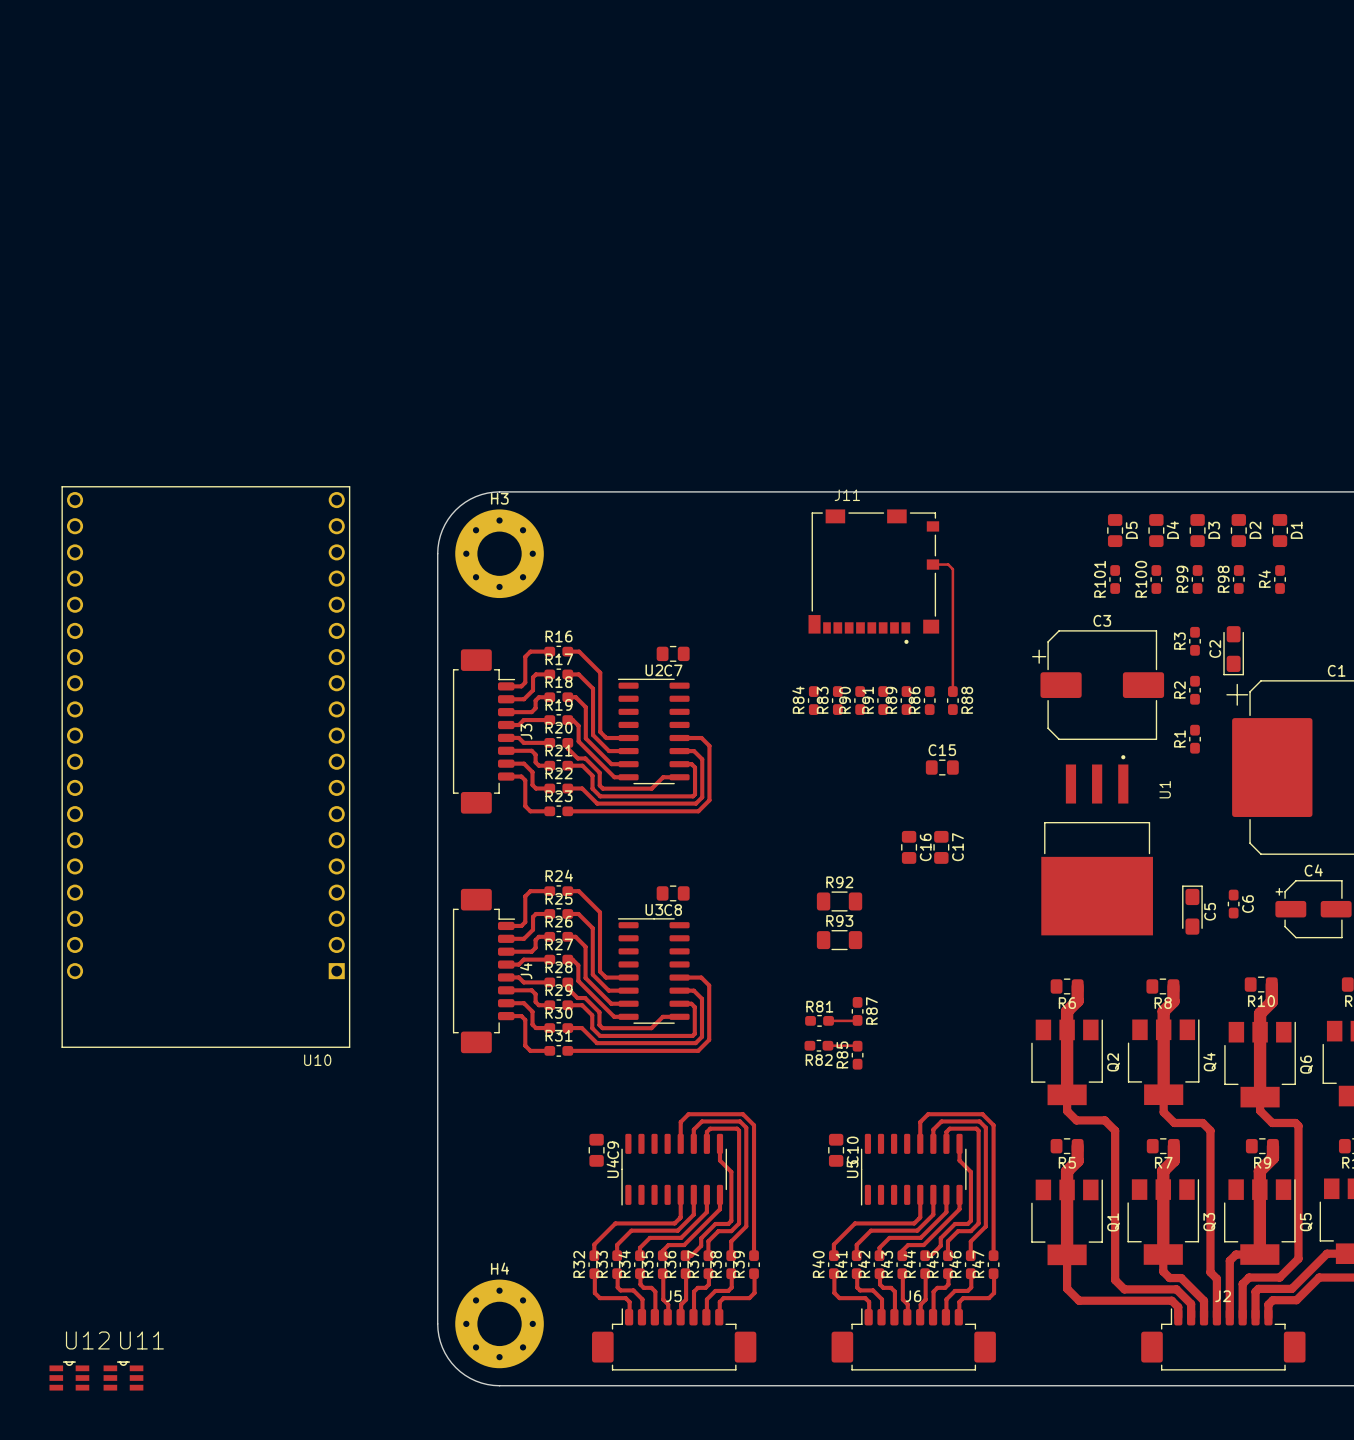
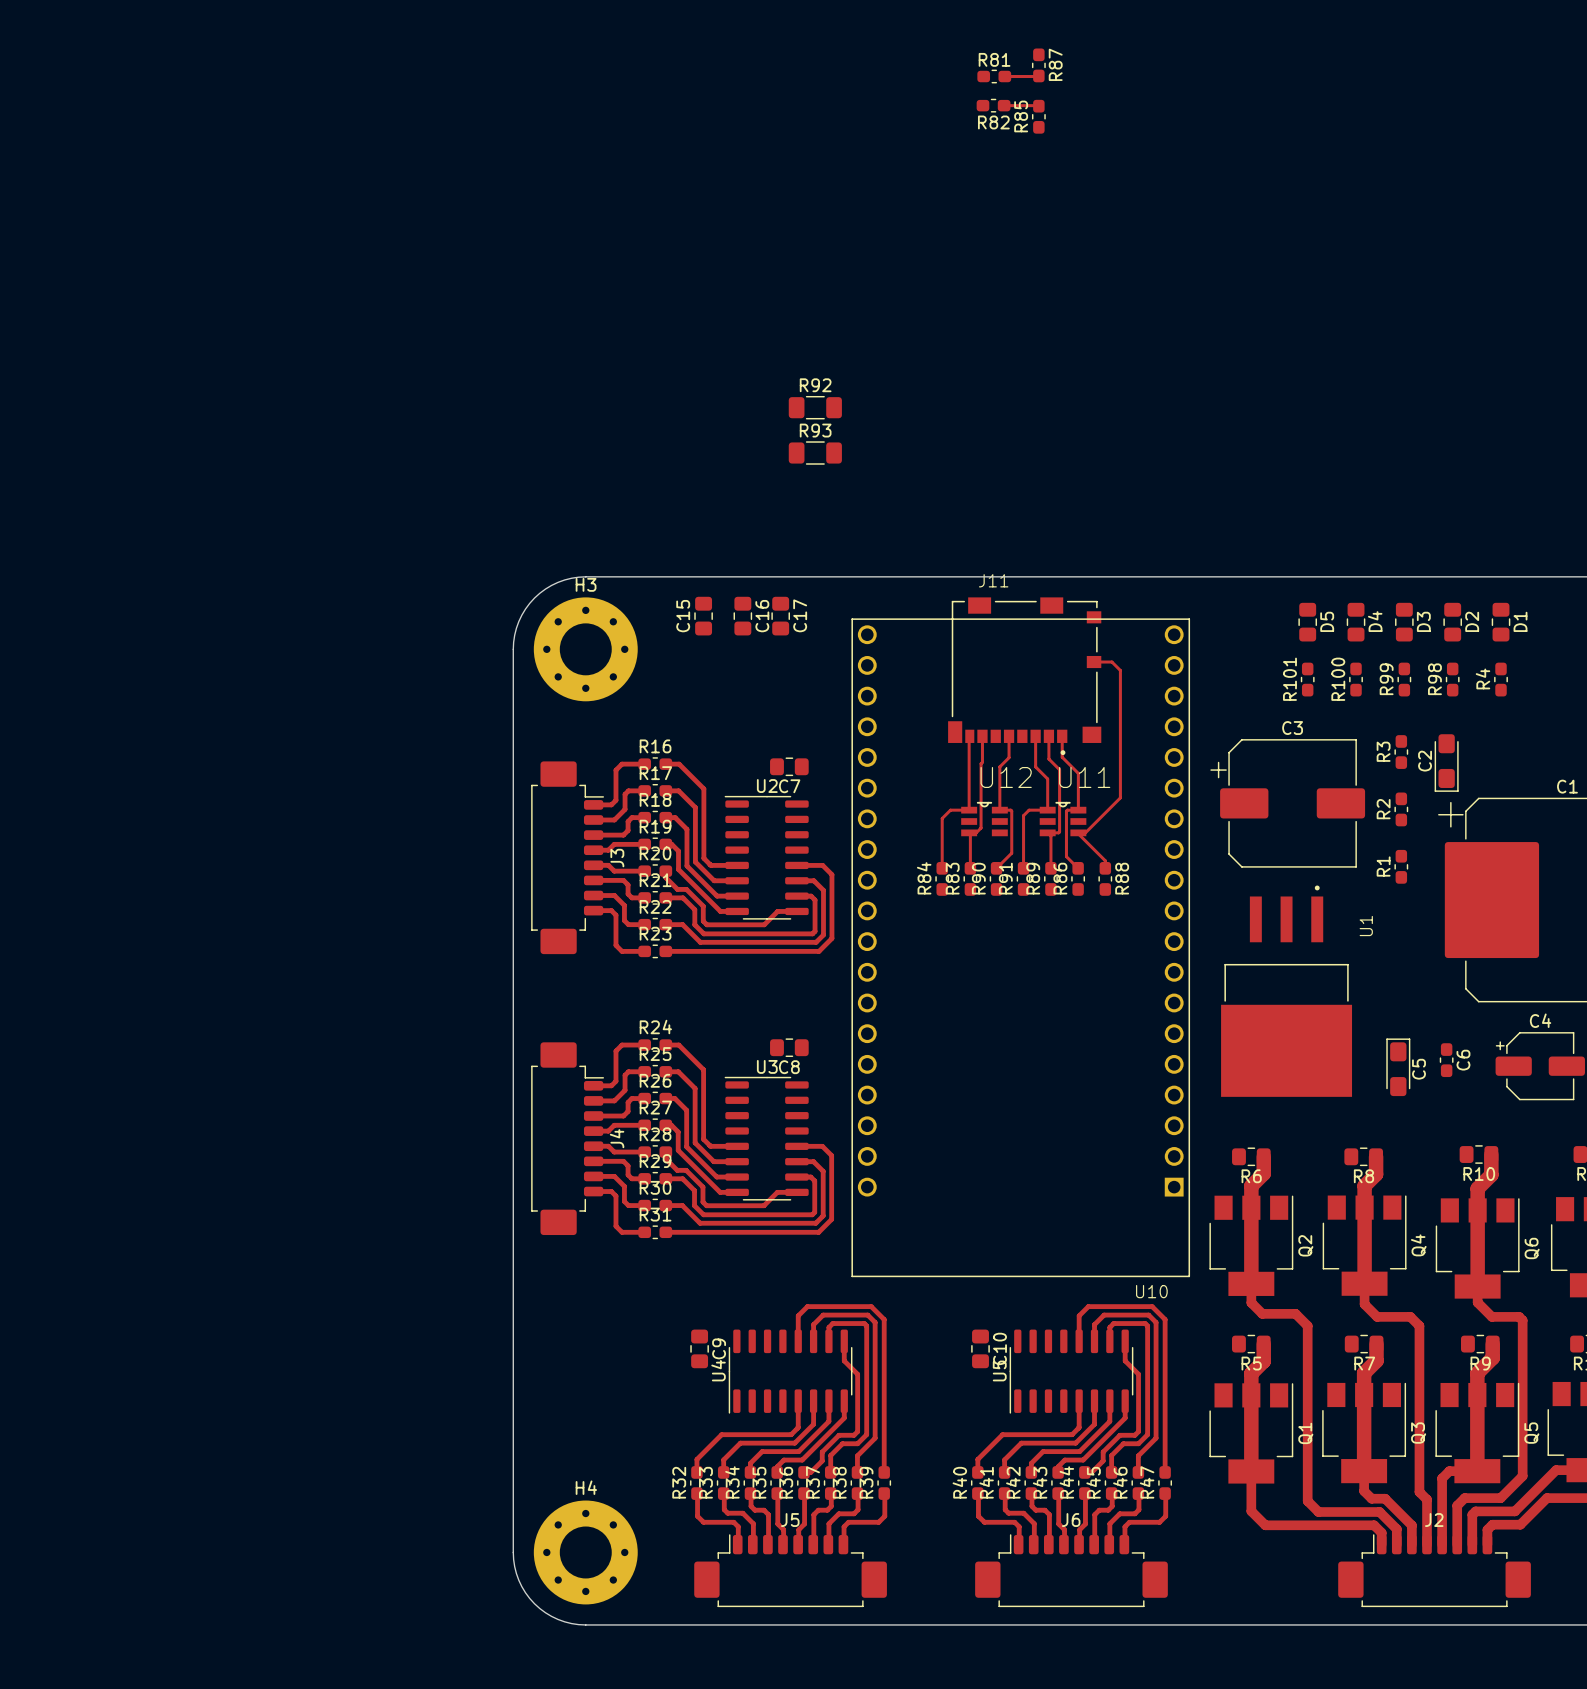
track: none -> (1038, 75) (1004, 76)
track: none -> (1004, 105) (1038, 106)
track: (952, 569) (952, 691) -> (1117, 667) (1120, 670) (1120, 797) (1085, 832) (1078, 832) (1105, 860) (1105, 868)
track: none -> (969, 736) (969, 810) (950, 810) (942, 818) (942, 868)
track: none -> (982, 736) (981, 828) (976, 832) (969, 832) (970, 868)
track: none -> (1009, 736) (1009, 757) (999, 766) (999, 810) (1011, 811) (1011, 853) (996, 868)
track: none -> (1035, 736) (1035, 766) (1047, 778) (1047, 810) (1029, 810) (1023, 815) (1023, 868)
track: none -> (1048, 736) (1048, 759) (1059, 769) (1059, 831) (1047, 832) (1050, 836) (1050, 868)
track: none -> (1062, 736) (1062, 757) (1078, 773) (1078, 810) (1066, 811) (1066, 856) (1078, 868)
R84 position: (813, 700) -> (942, 878)
R83 position: (837, 700) -> (970, 878)
R90 position: (860, 700) -> (996, 878)
R91 position: (883, 700) -> (1023, 878)
R89 position: (906, 700) -> (1050, 878)
R86 position: (929, 700) -> (1078, 878)
R88 position: (952, 700) -> (1105, 878)
C15 name position: C15 (942, 750) -> C15 (683, 616)
U10 position: (205, 767) -> (1020, 947)
C15 rotation: 0° (942, 767) -> 90° clockwise (703, 616)
C15 position: (942, 767) -> (703, 616)
C16 position: (909, 847) -> (742, 616)
C17 position: (941, 847) -> (780, 616)
R92 position: (839, 901) -> (815, 407)
R93 position: (839, 940) -> (815, 453)
R87 position: (857, 1011) -> (1038, 65)
R81 position: (819, 1020) -> (994, 76)
track: (857, 1020) (828, 1020) -> none
R82 position: (818, 1045) -> (993, 105)
track: (827, 1045) (857, 1046) -> none
R85 position: (857, 1055) -> (1038, 116)
U12 position: (69, 1375) -> (984, 819)
U11 position: (123, 1375) -> (1063, 819)

